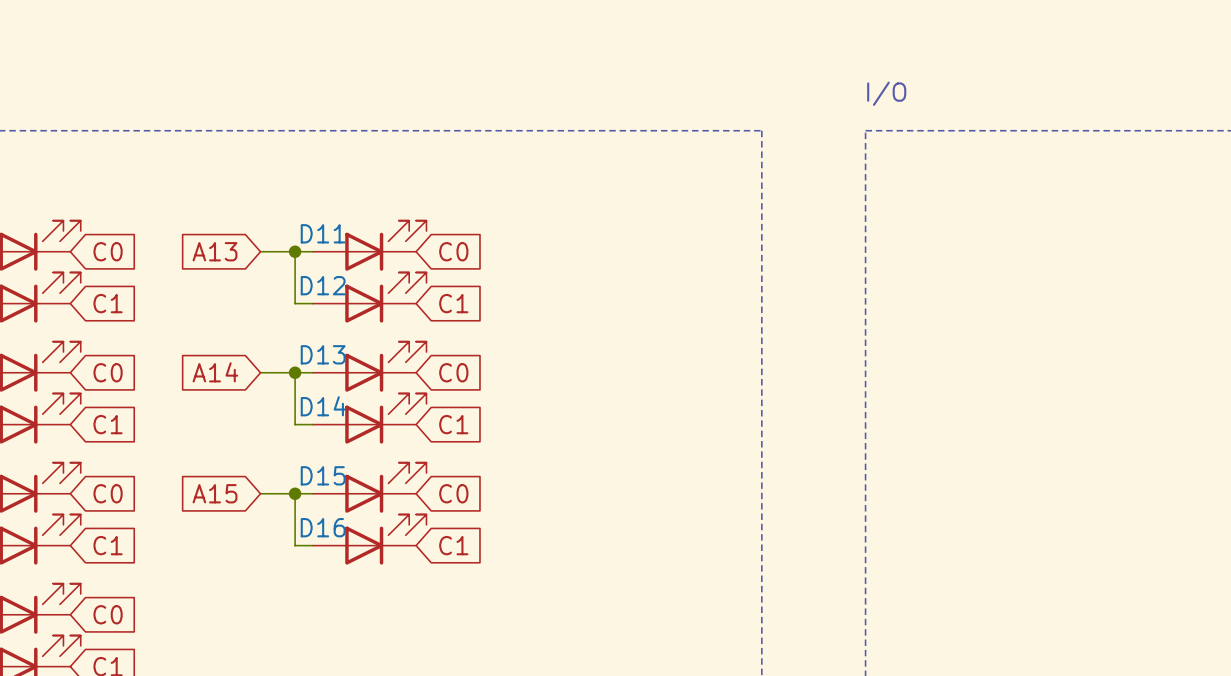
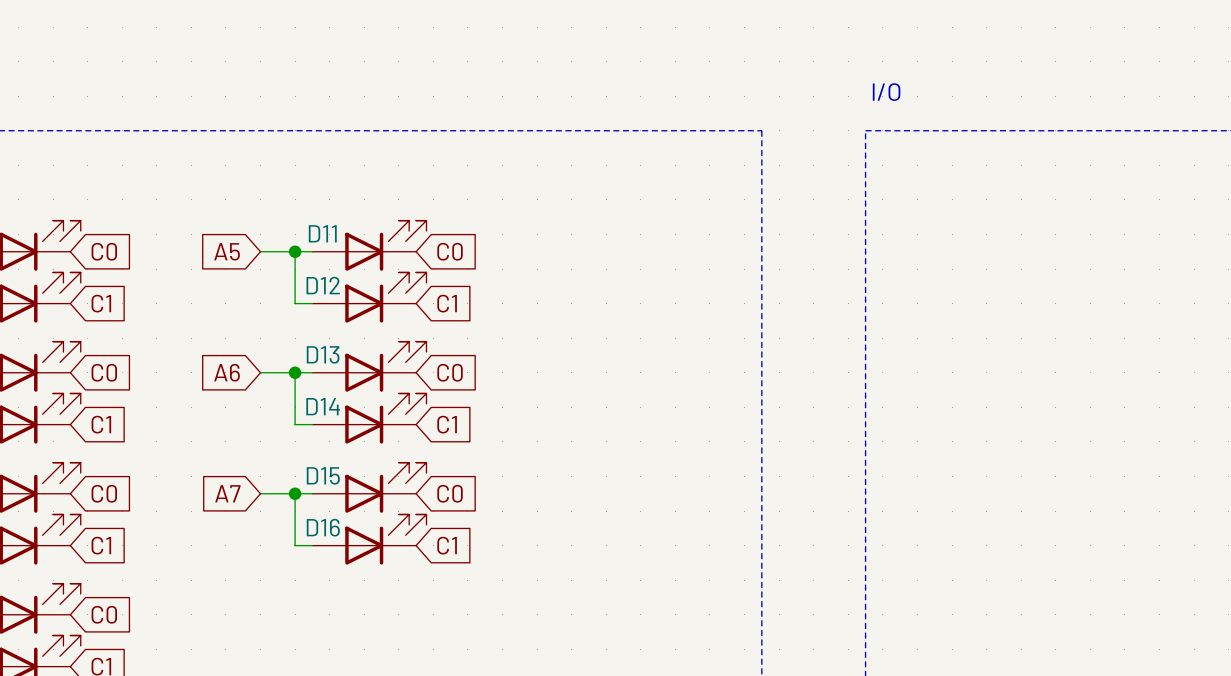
global label: A13 (215, 251) -> A5 (227, 251)
global label: A14 (215, 372) -> A6 (227, 372)
global label: A15 (215, 493) -> A7 (227, 493)

